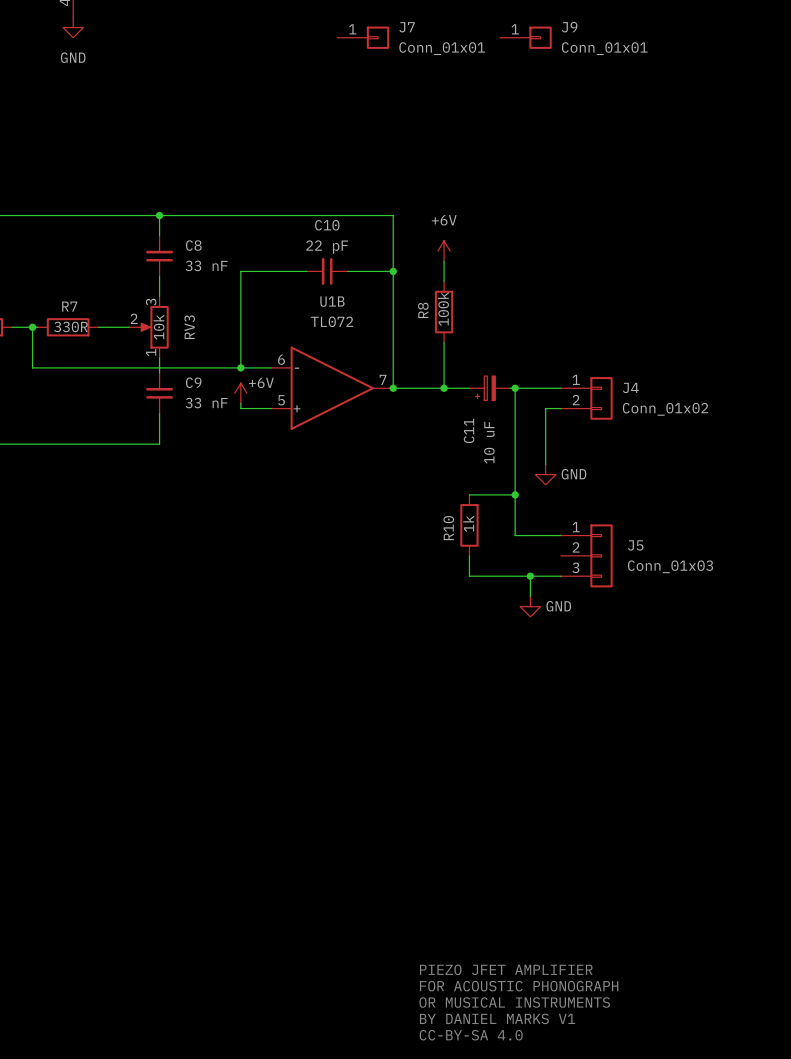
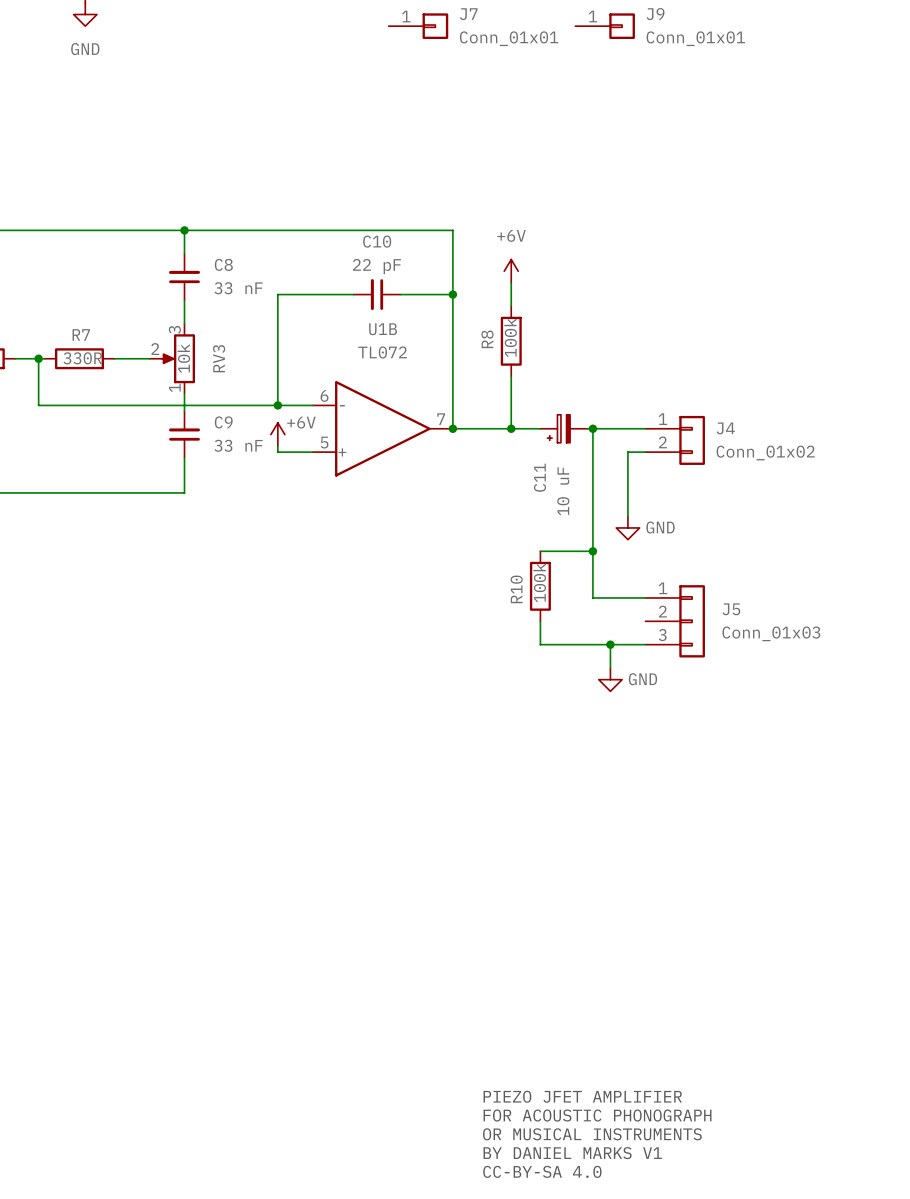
R10 value: 1k (468, 523) -> 100k (539, 582)

